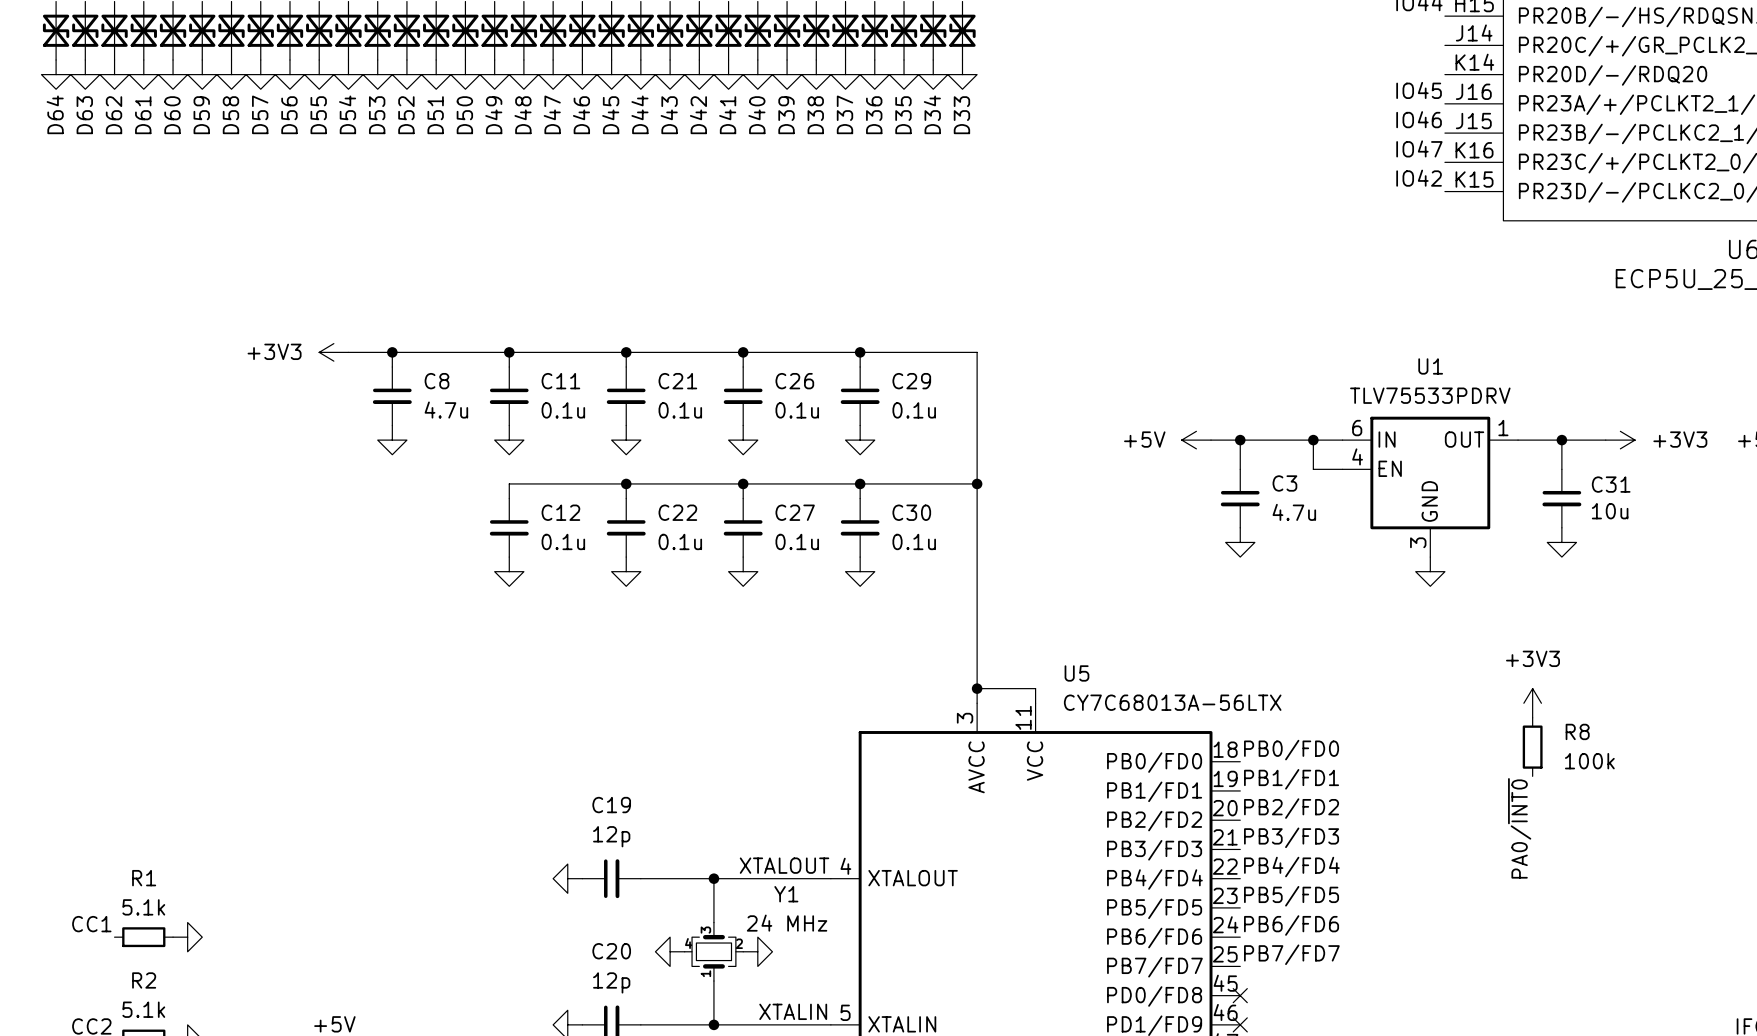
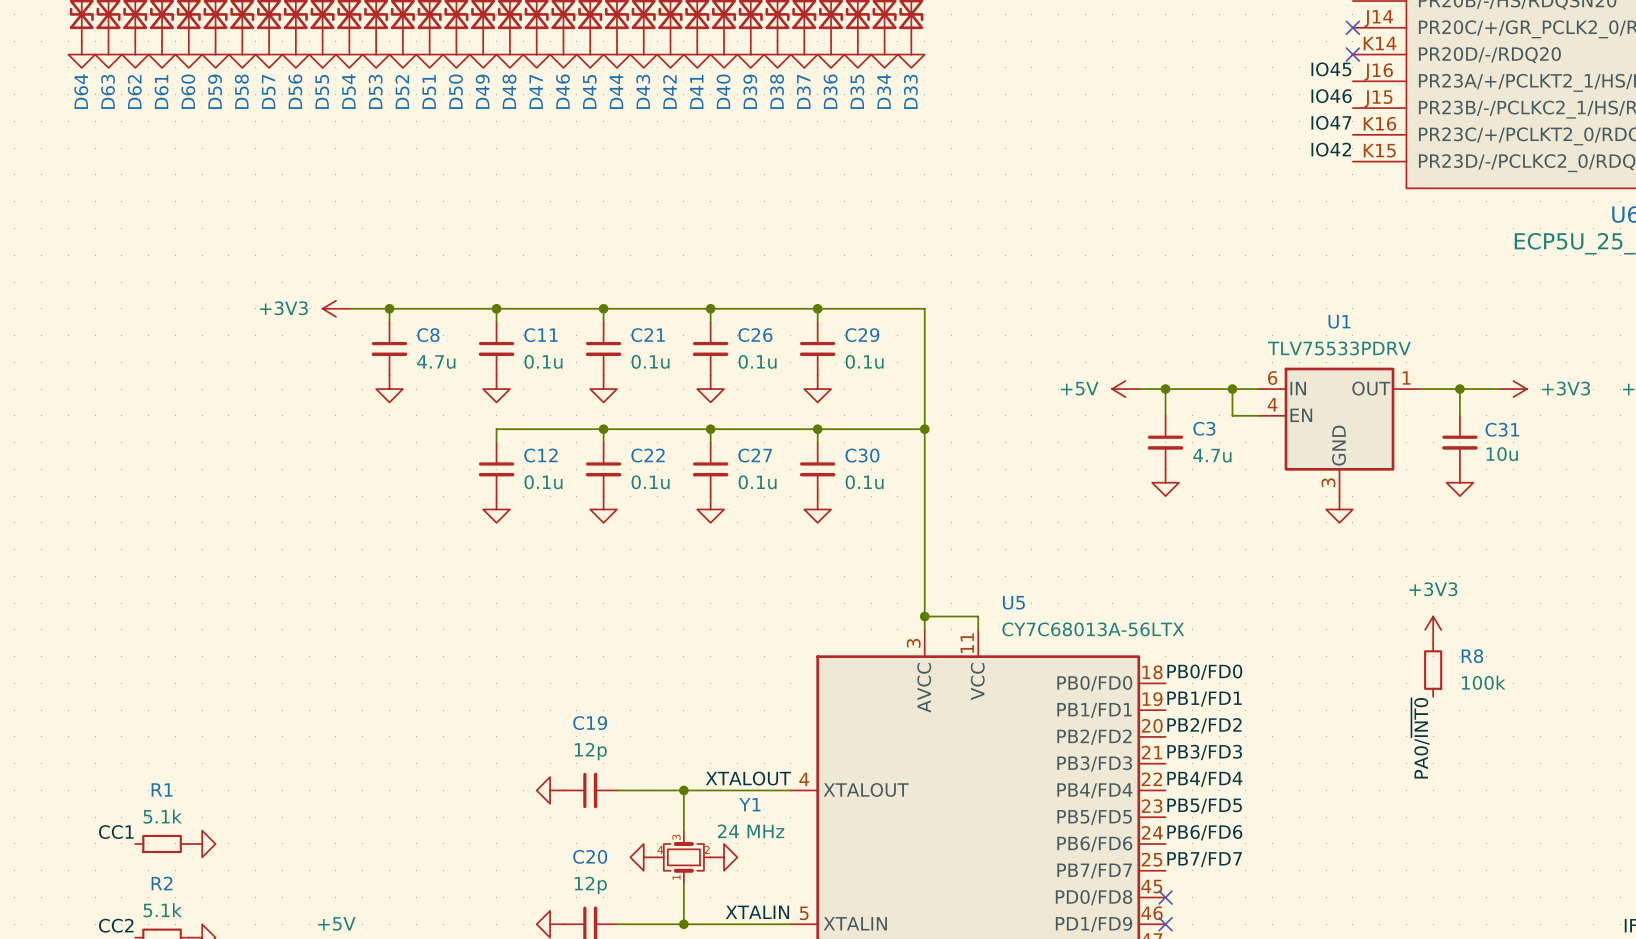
no-connect mark: none -> (1352, 27)
no-connect mark: none -> (1352, 54)

